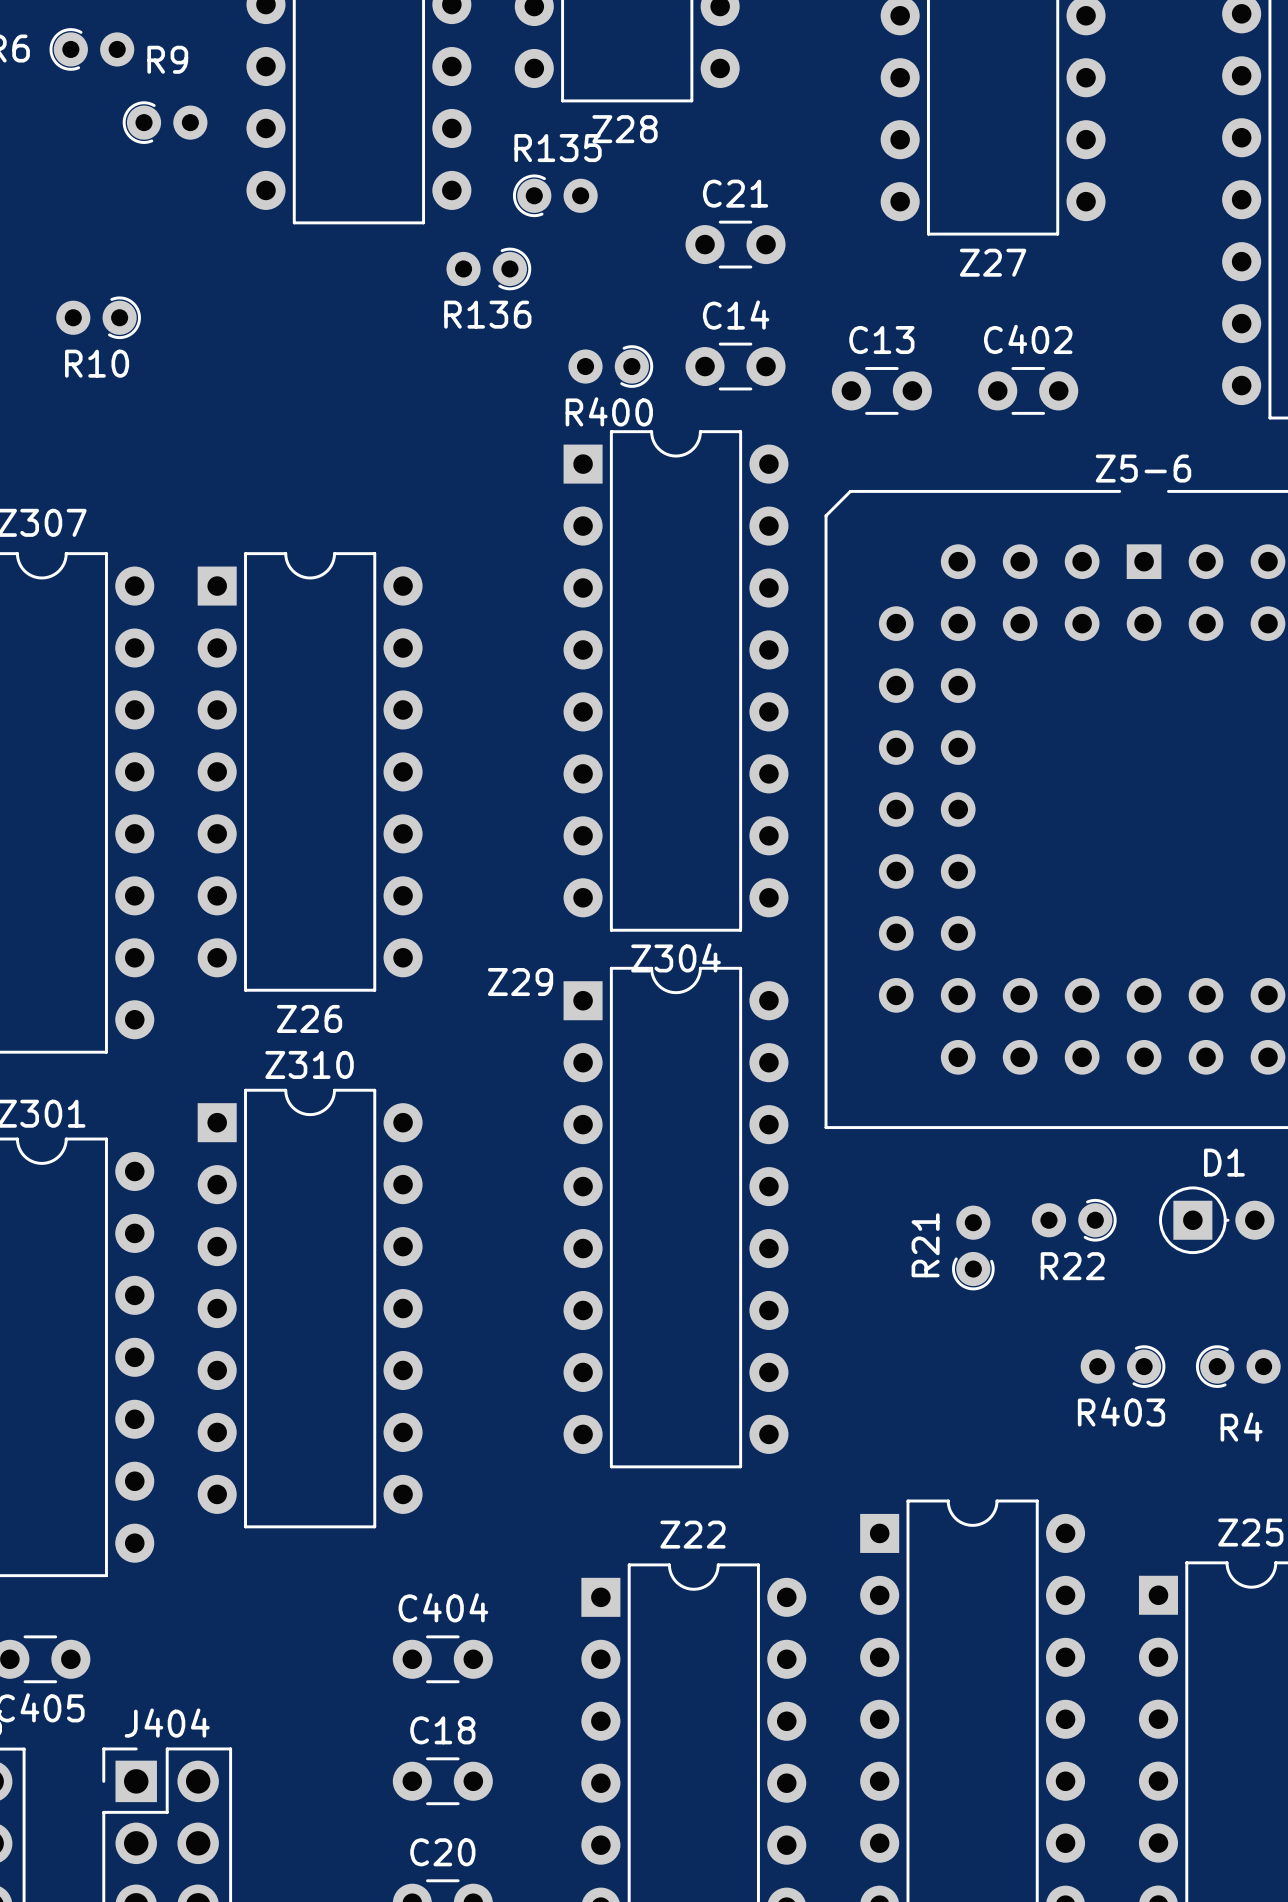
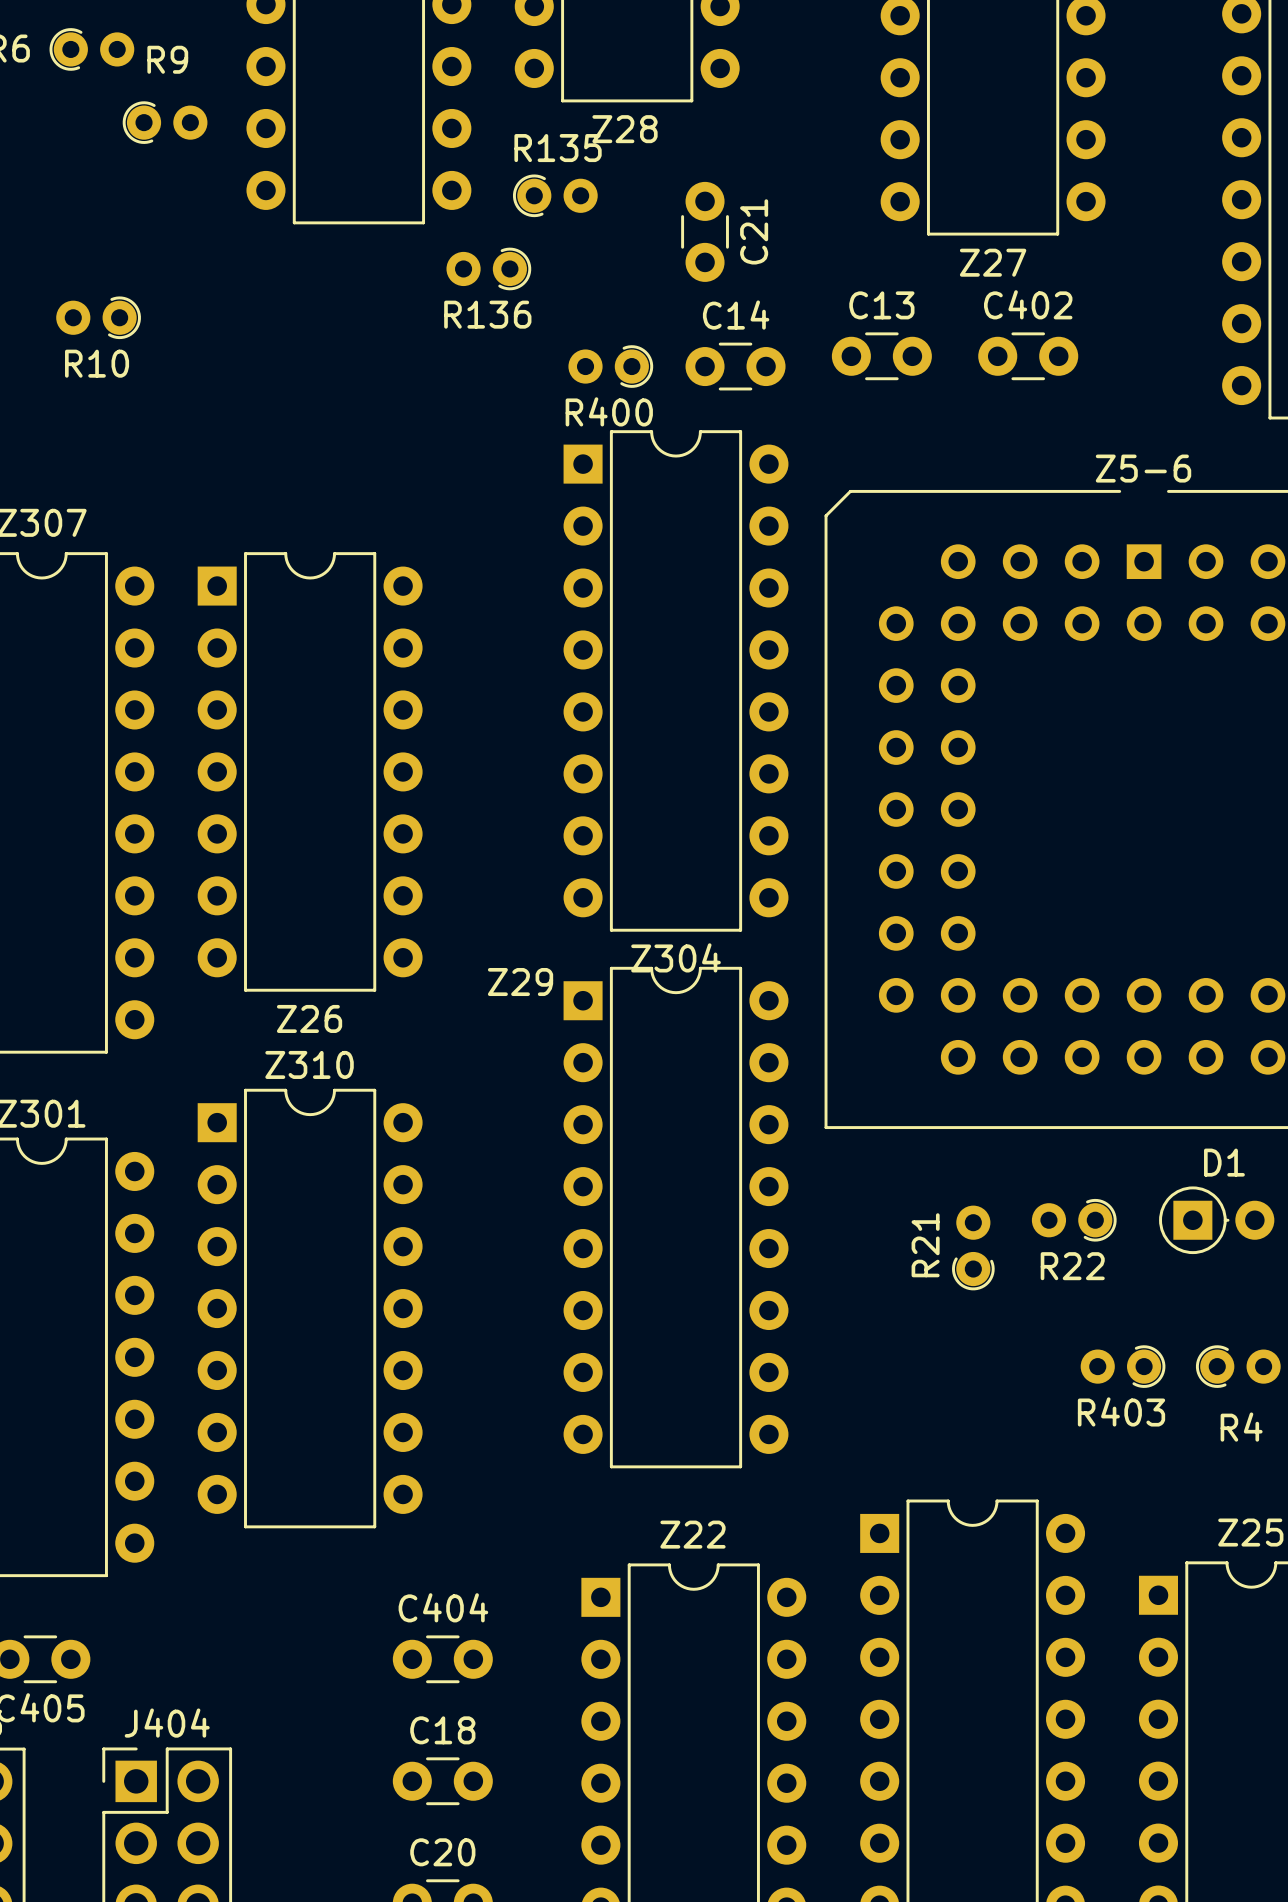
C21 rotation: 0° (735, 244) -> 90° clockwise (705, 231)
C13 position: (881, 390) -> (881, 356)
C402 position: (1028, 390) -> (1028, 356)

